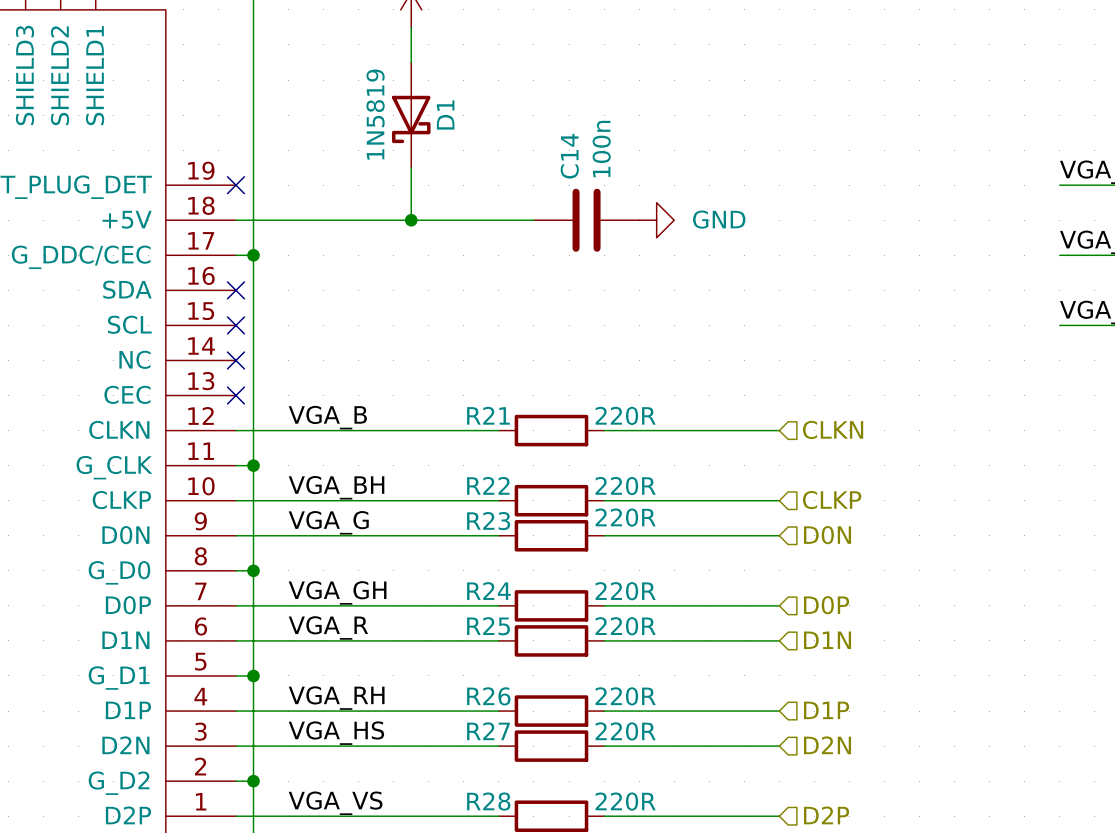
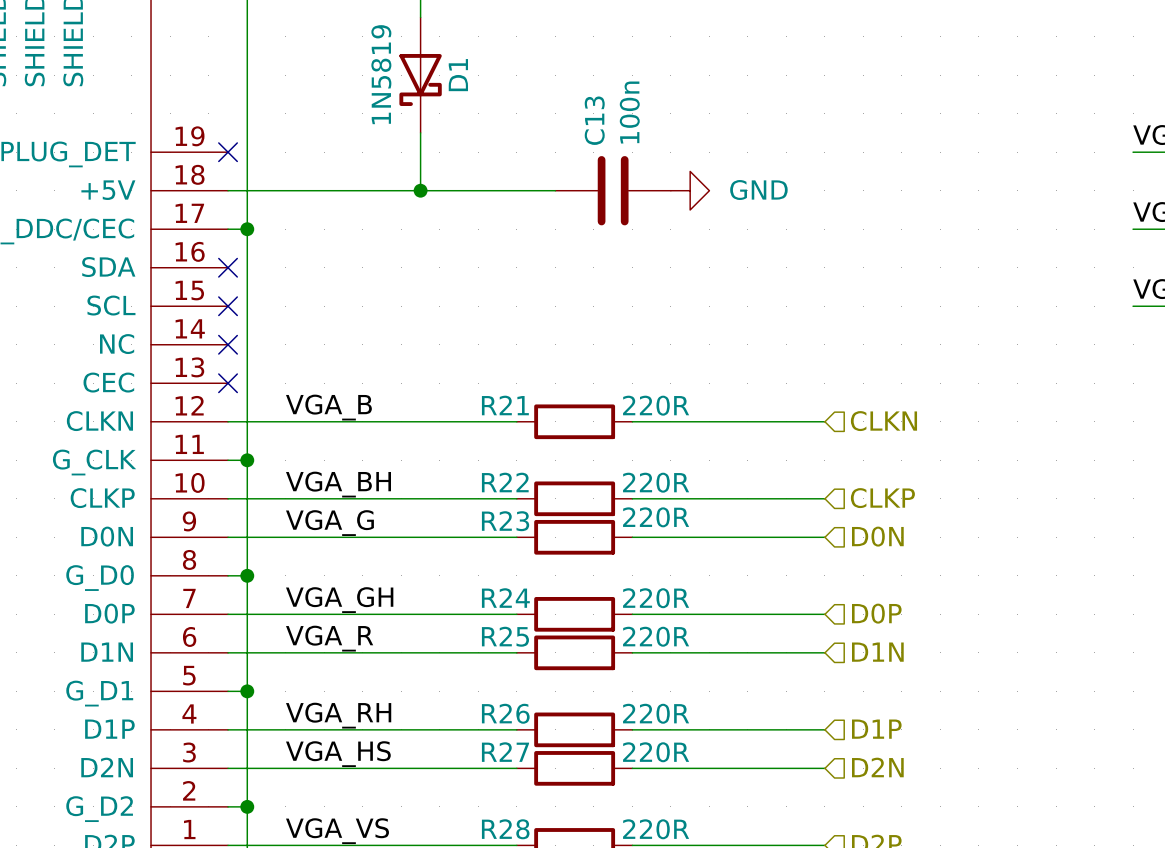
C14 name: C14 (569, 156) -> C13 (594, 120)

